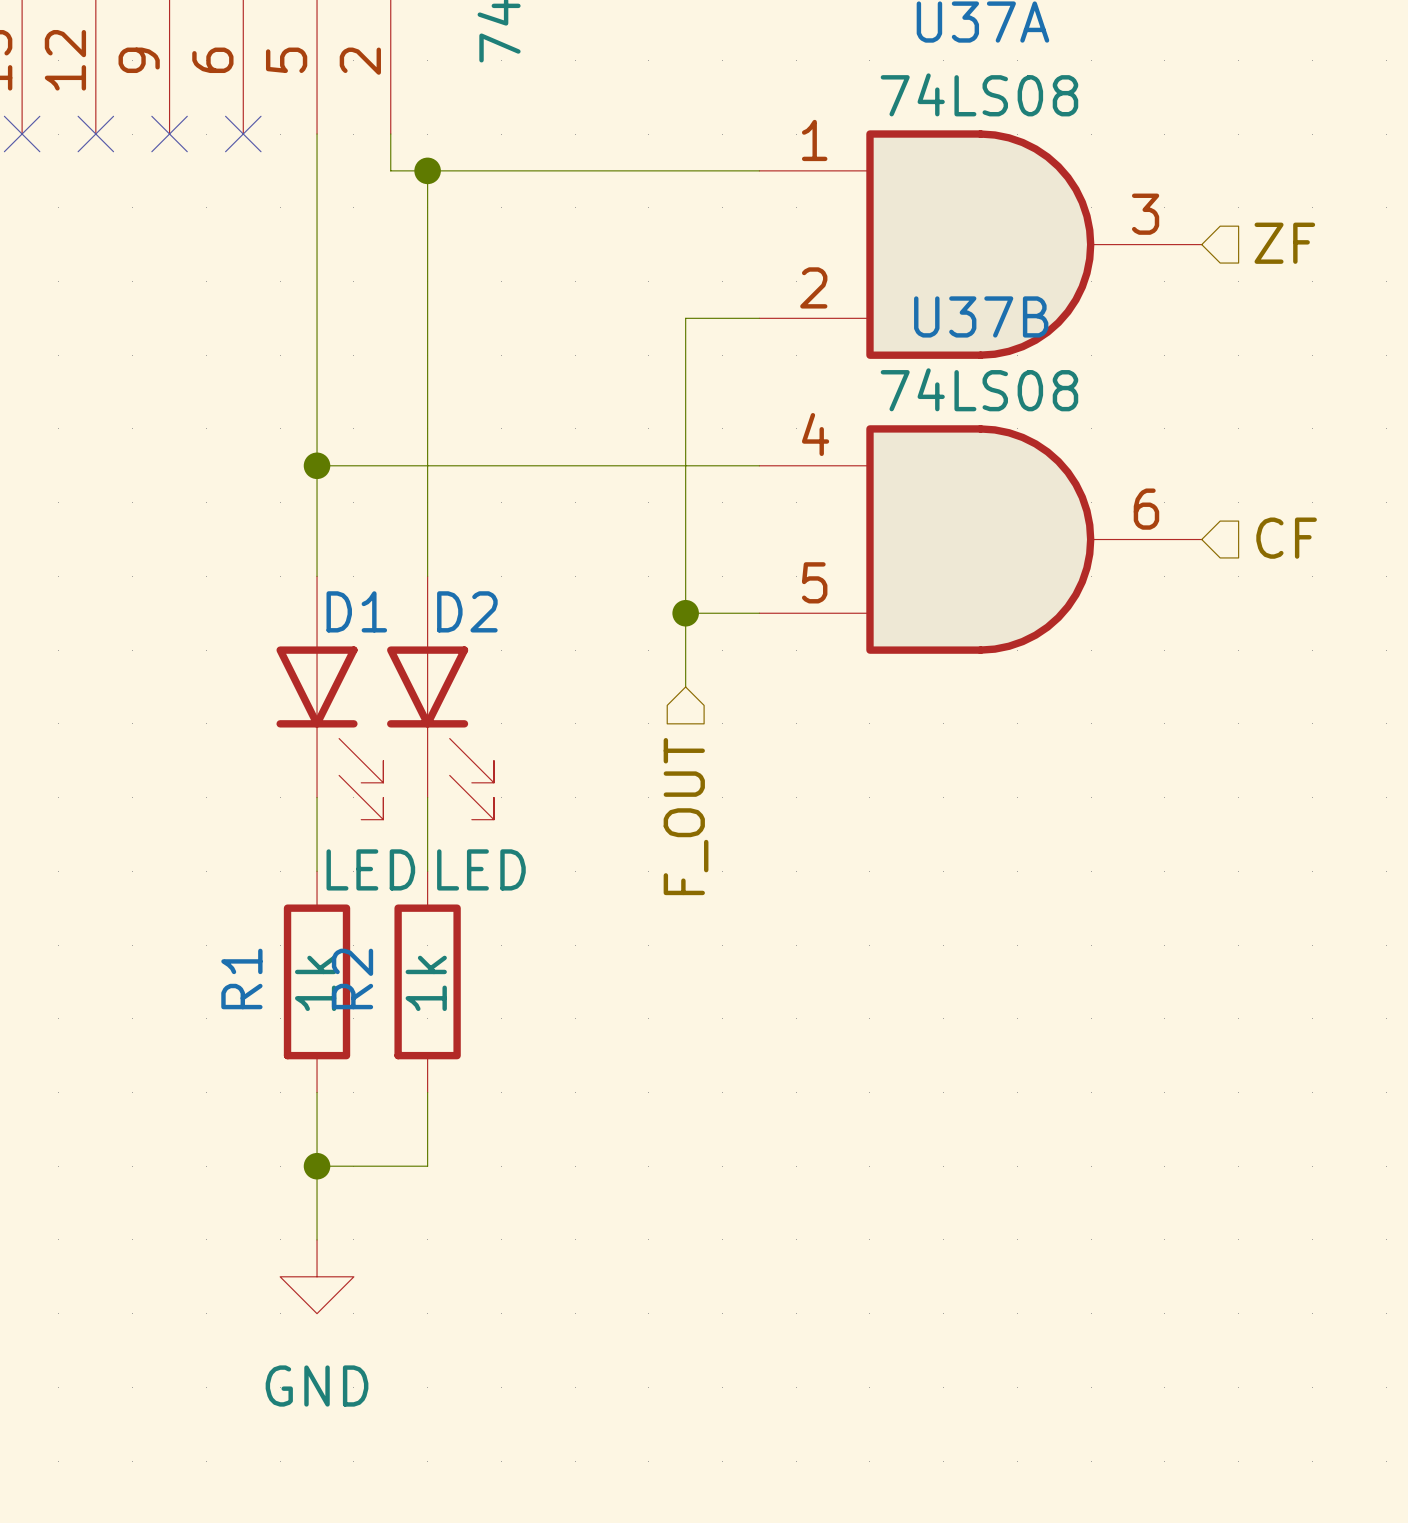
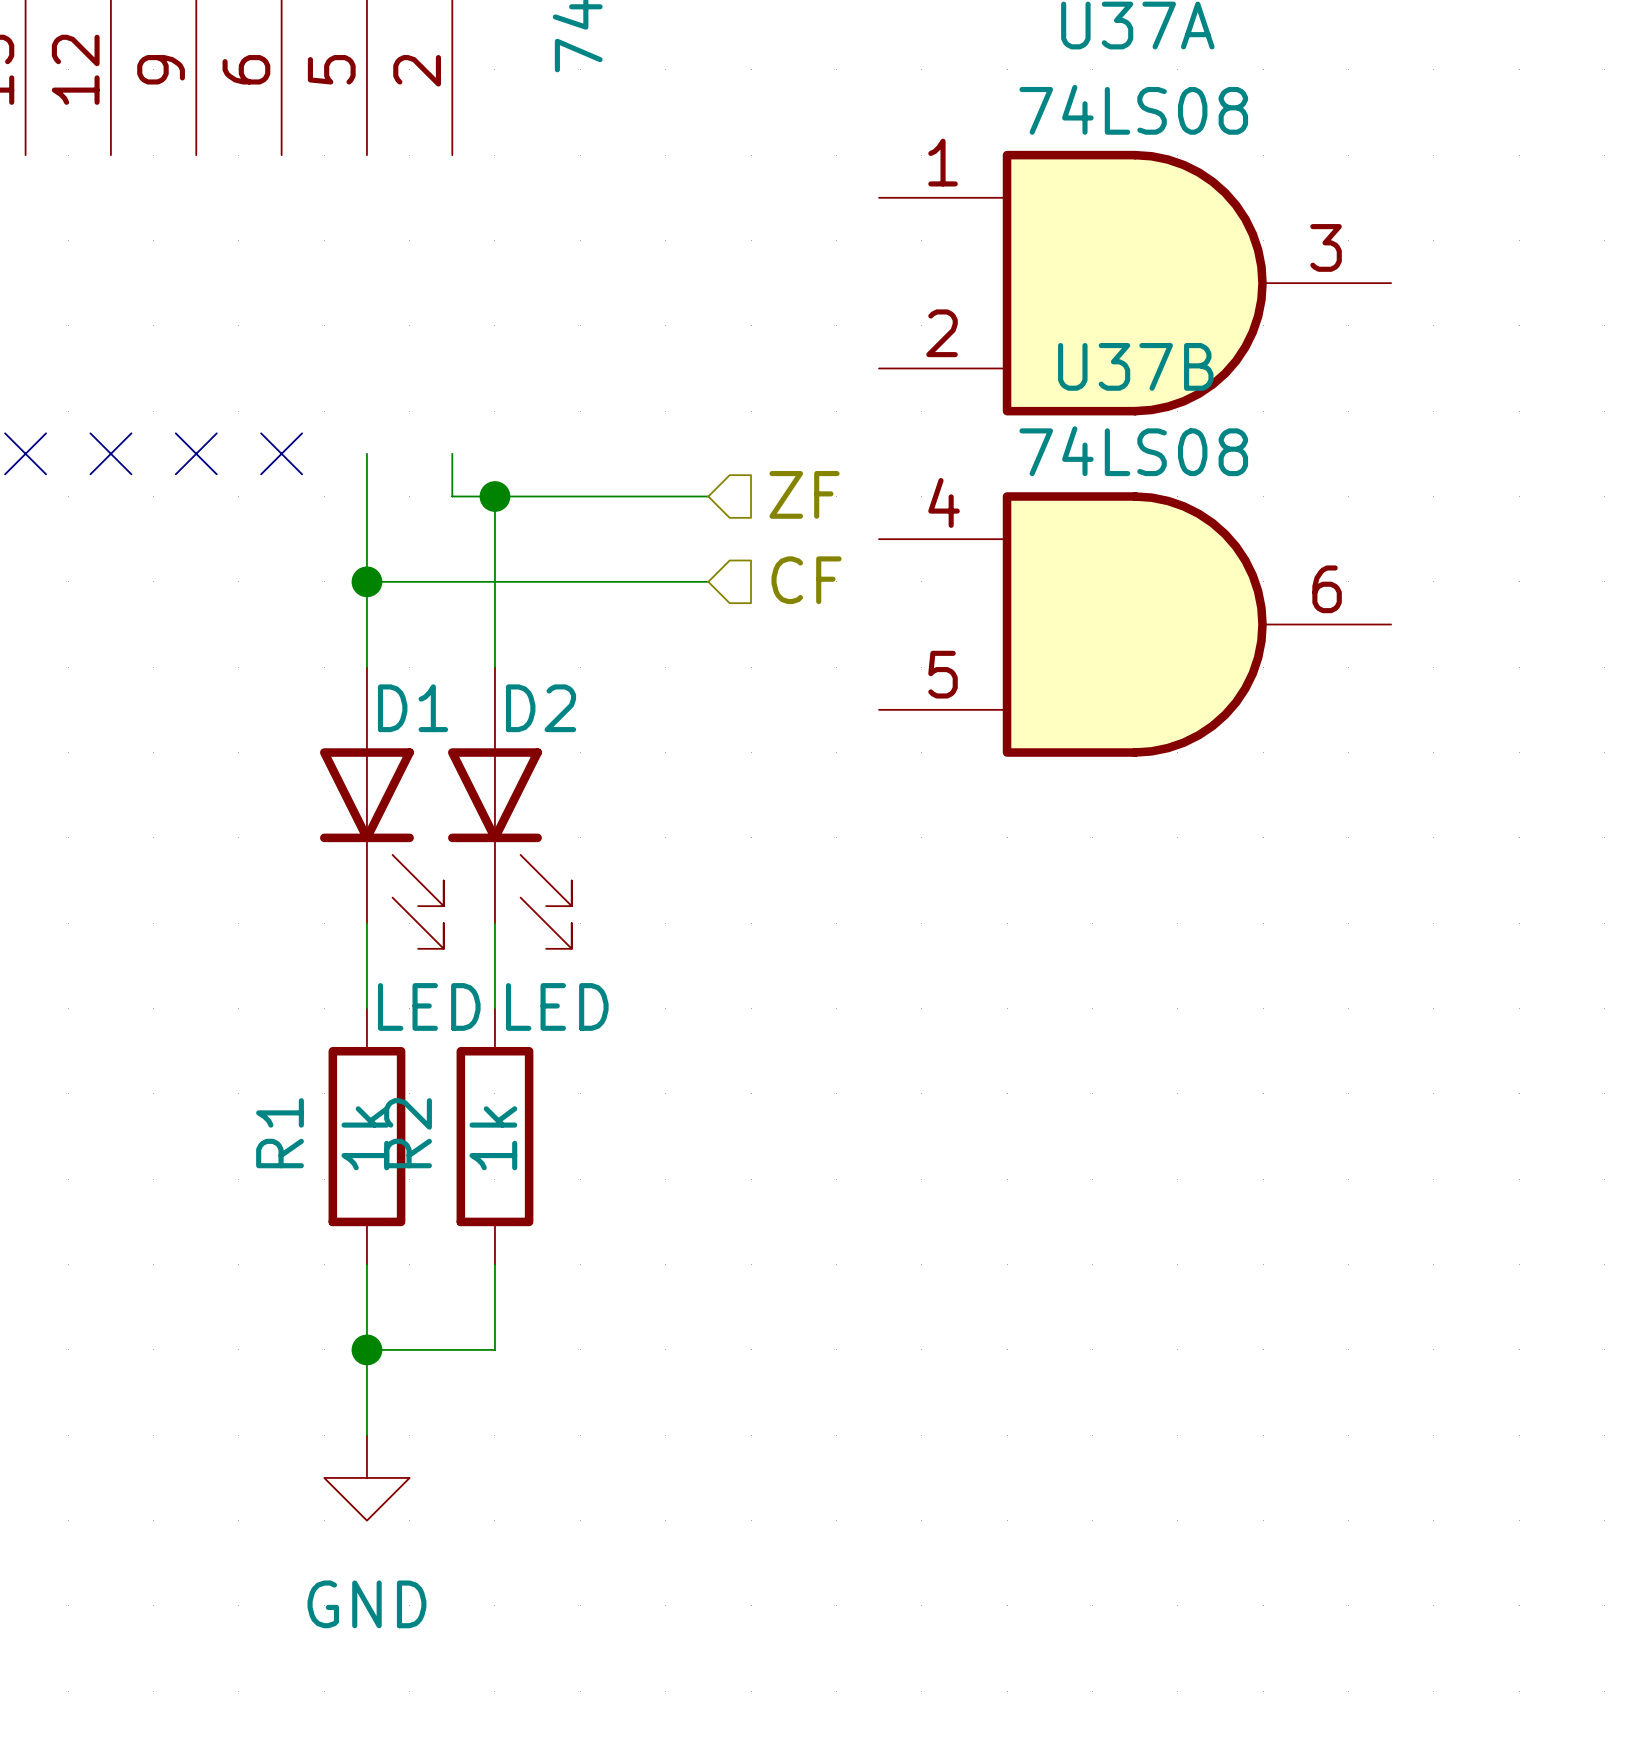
no-connect mark: (22, 134) -> none
no-connect mark: (95, 134) -> none
no-connect mark: (169, 134) -> none
no-connect mark: (243, 134) -> none
wire: (317, 134) (317, 392) -> none
wire: (390, 134) (390, 170) (759, 170) -> none
wire: (427, 170) (427, 428) -> none
junction: (427, 170) -> none
hierarchical label position: ZF (1284, 243) -> ZF (804, 494)
wire: (759, 318) (685, 318) (685, 686) -> none
no-connect mark: none -> (25, 453)
no-connect mark: none -> (110, 453)
no-connect mark: none -> (196, 453)
no-connect mark: none -> (281, 453)
wire: none -> (452, 453) (452, 496) (708, 496)
junction: none -> (494, 496)
wire: (317, 465) (759, 465) -> none
junction position: (317, 465) -> (366, 581)
wire: none -> (366, 581) (708, 581)
hierarchical label position: CF (1286, 538) -> CF (806, 580)
wire: (685, 613) (759, 613) -> none
junction: (685, 613) -> none
hierarchical label: F_OUT (686, 816) -> none

